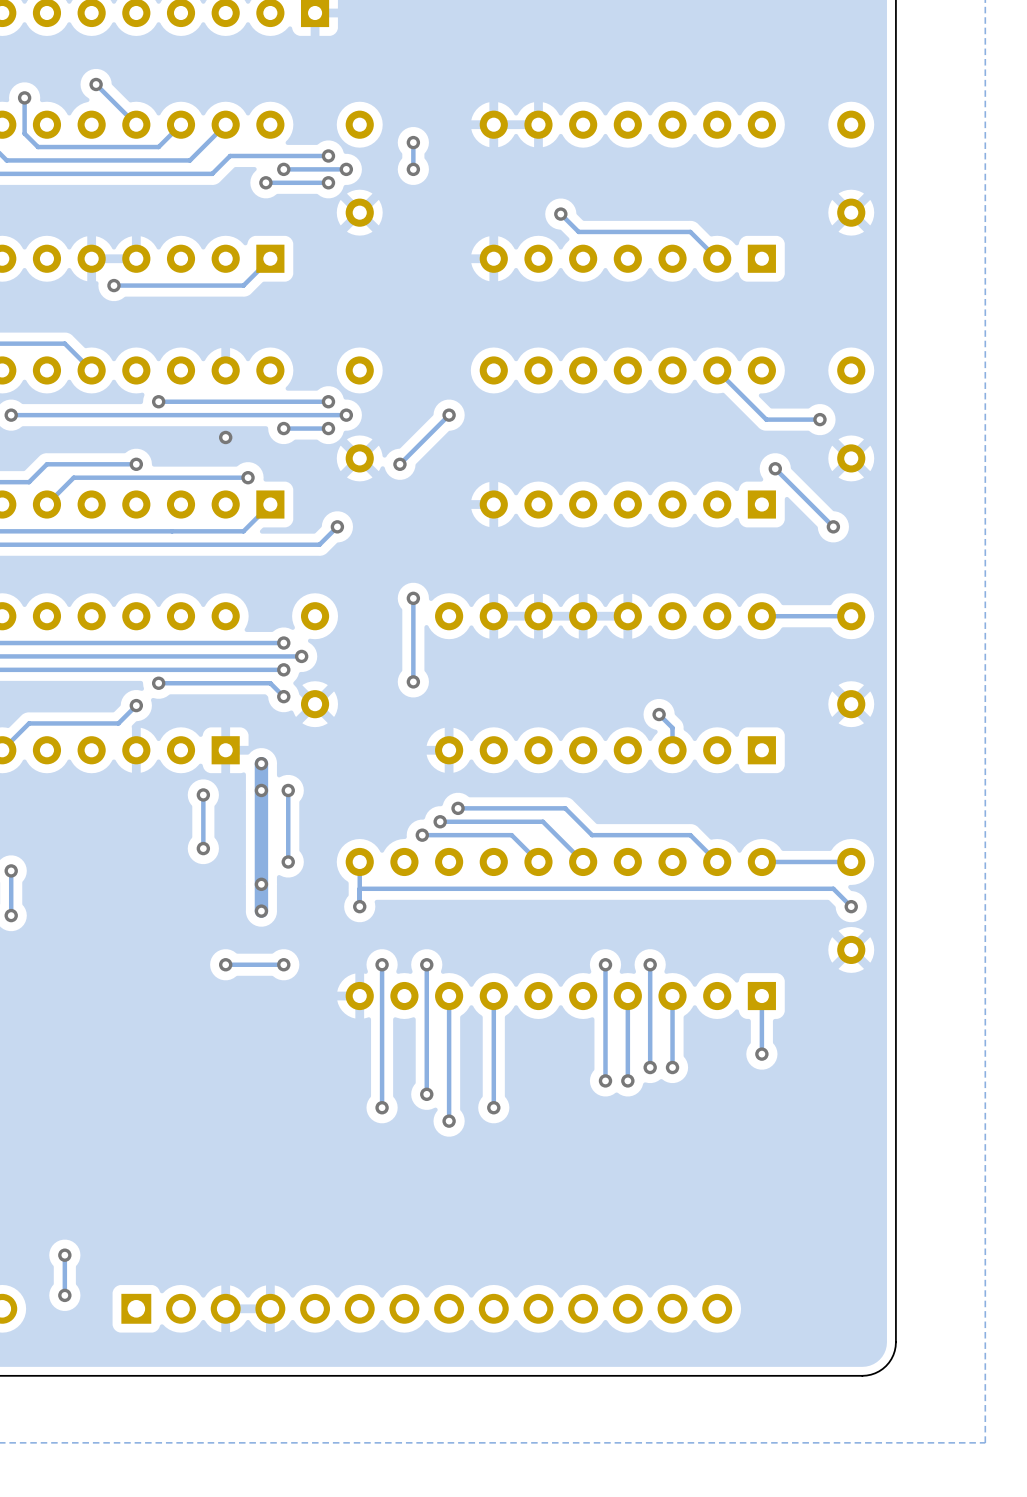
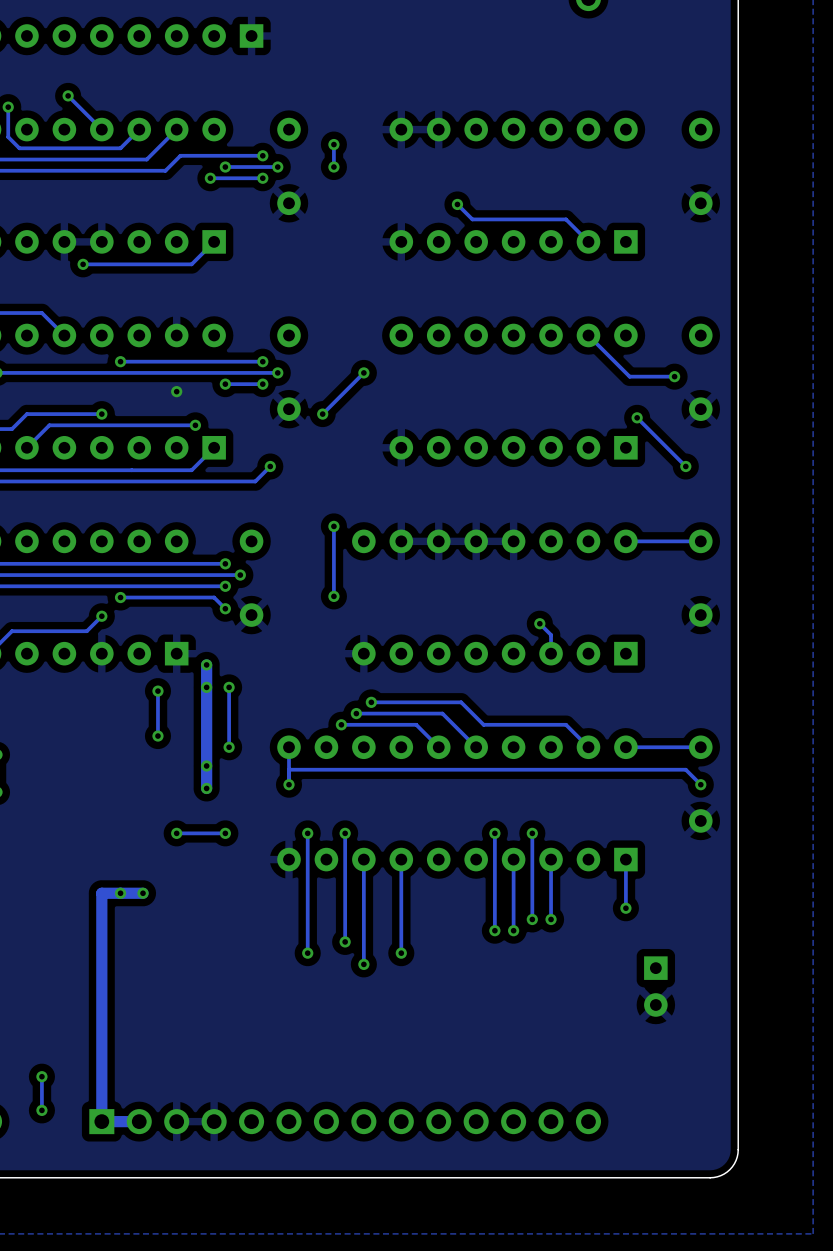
via: none -> (120, 893)
track: none -> (143, 893) (101, 893) (101, 1121) (139, 1121)
via: none -> (143, 893)
part: none -> (655, 986)

